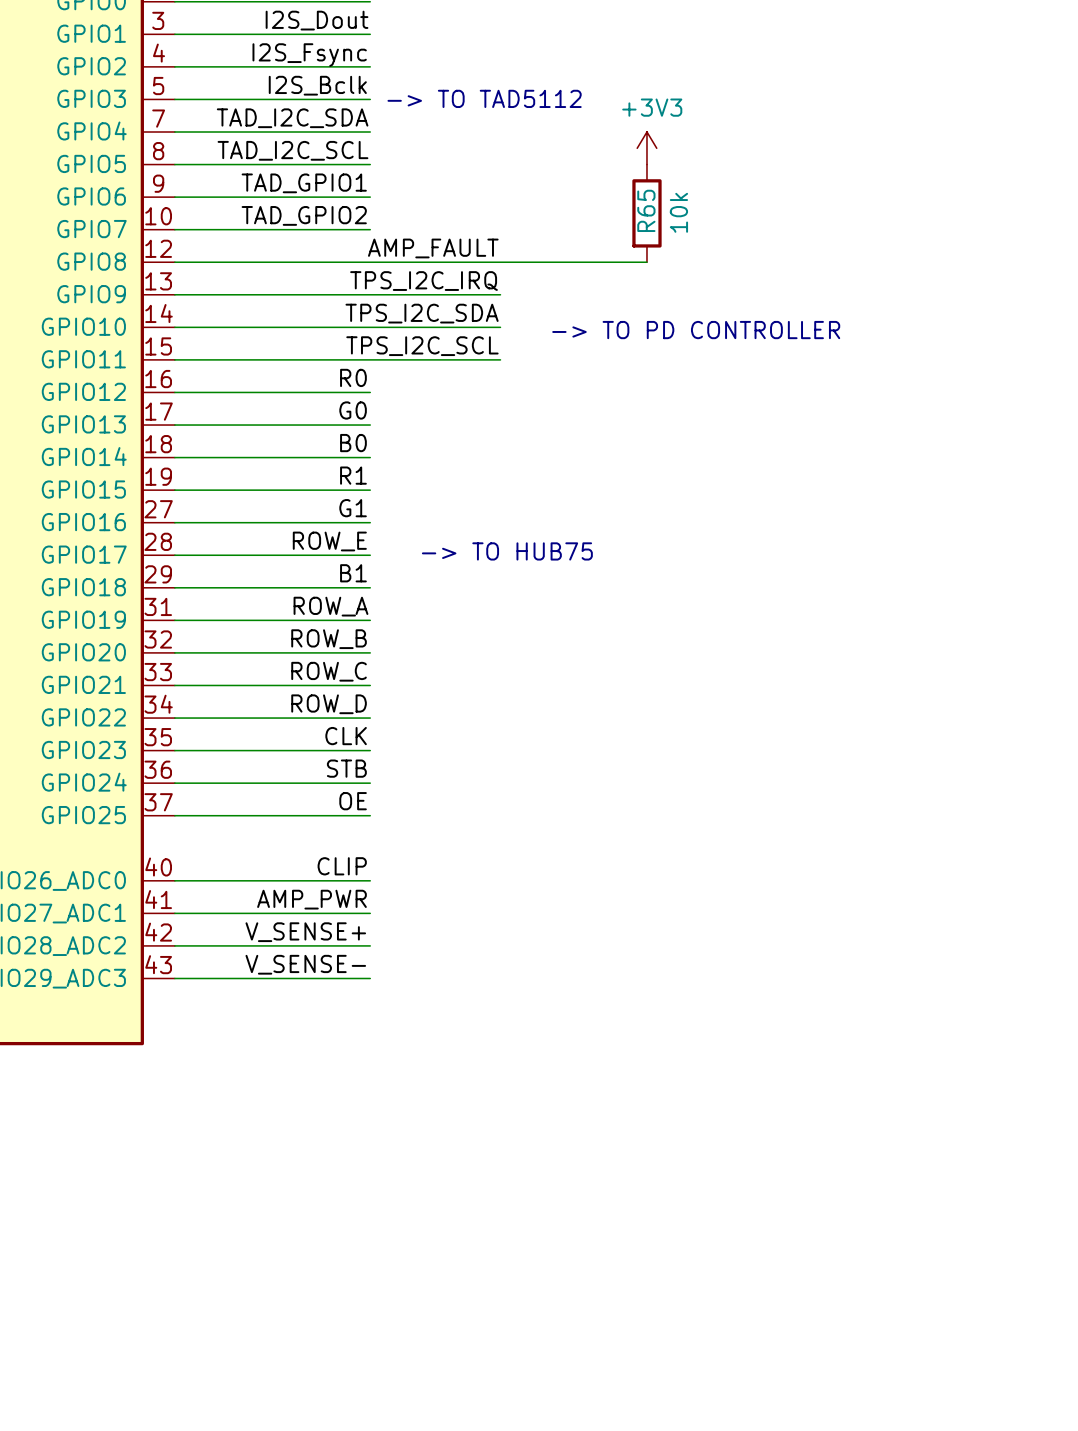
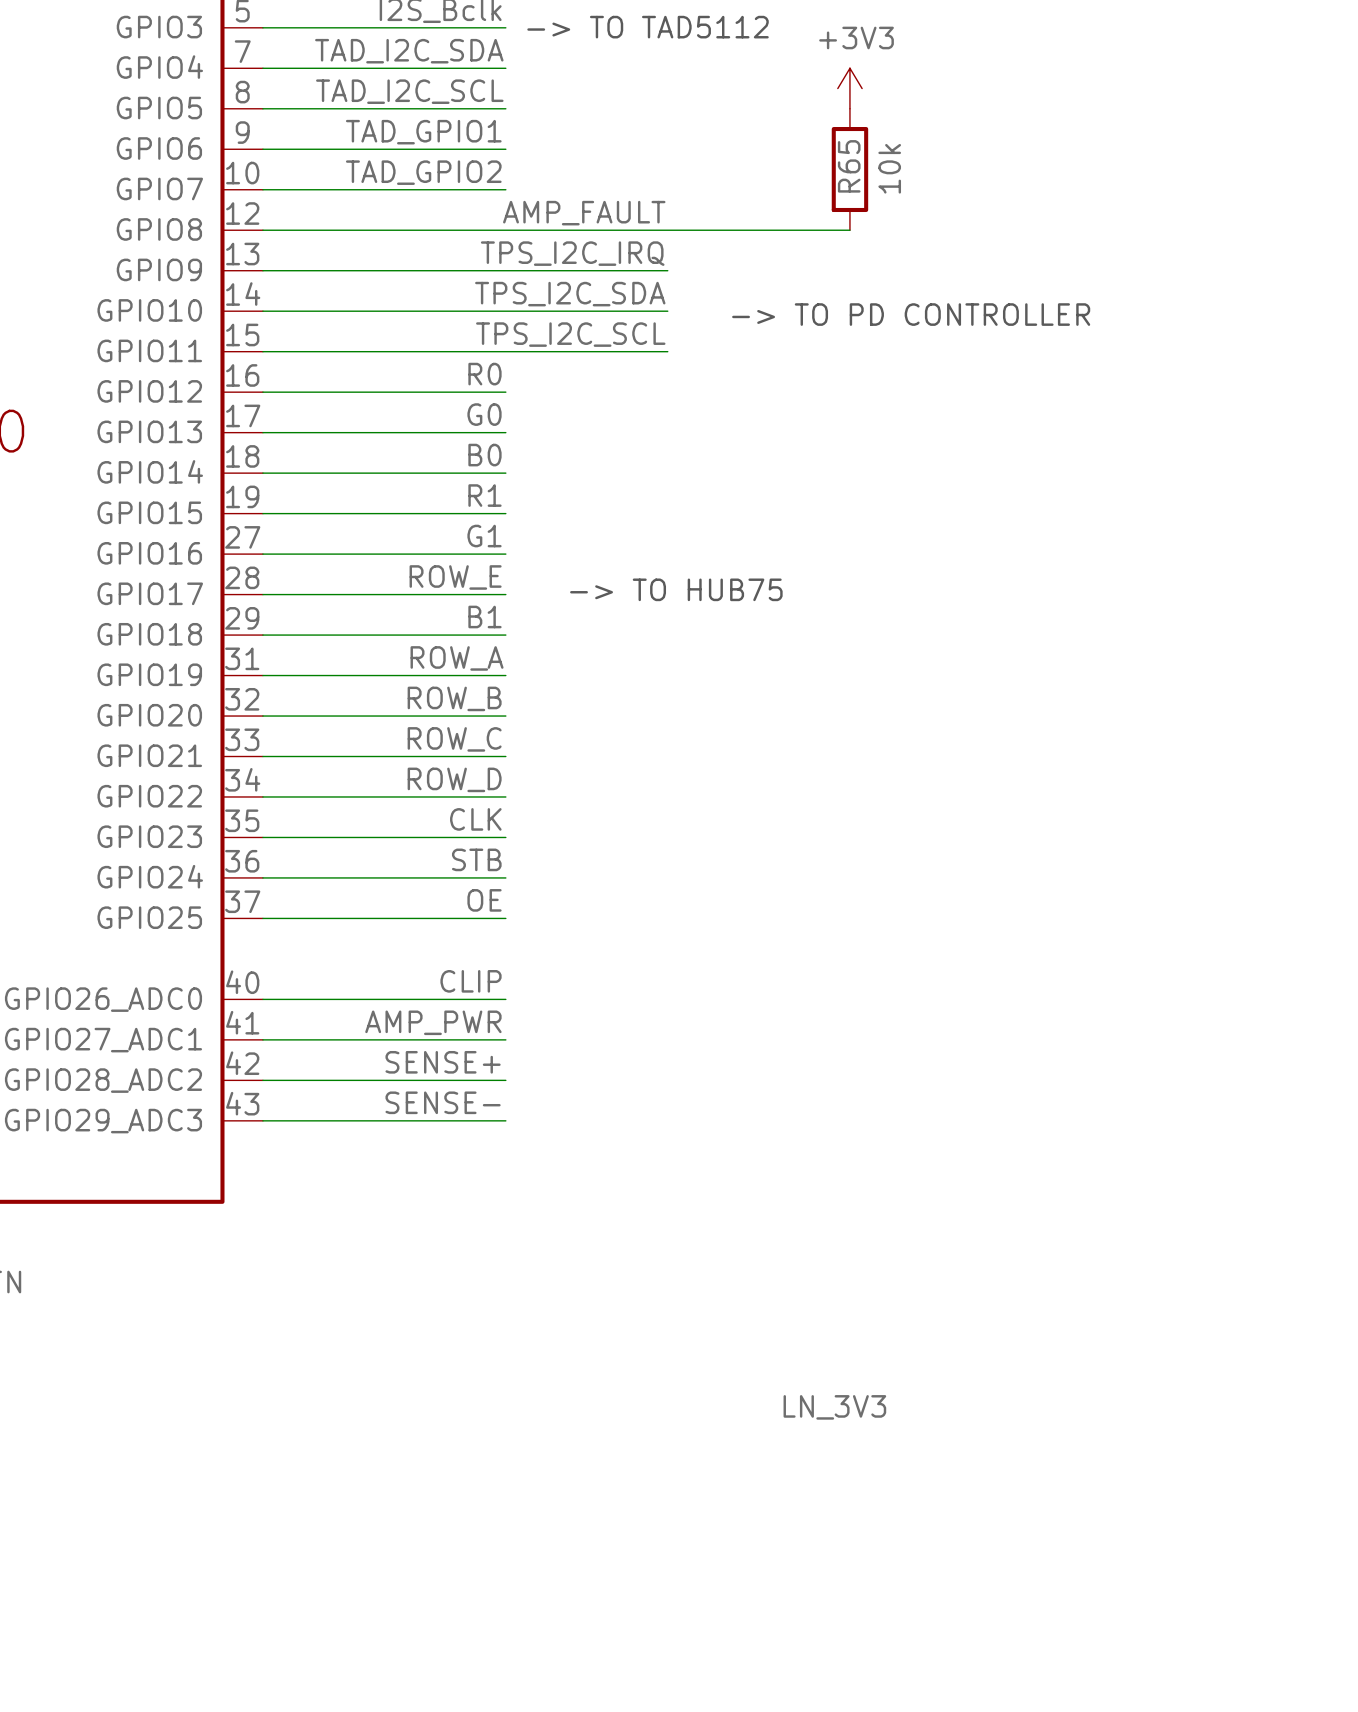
label: V_SENSE+ (305, 932) -> SENSE+ (443, 1062)
label: V_SENSE- (305, 964) -> SENSE- (443, 1102)
label: none -> LN_3V3 (834, 1407)

